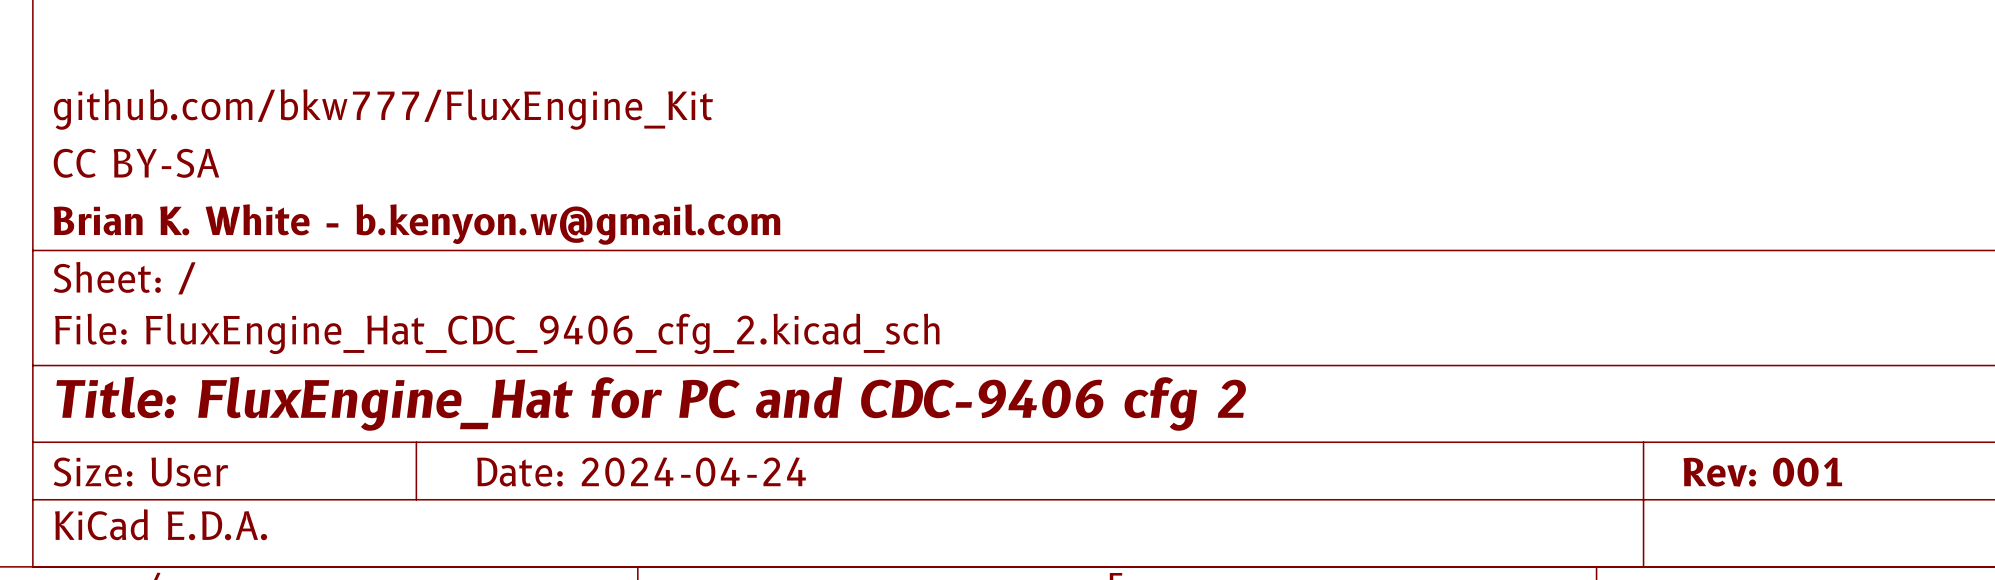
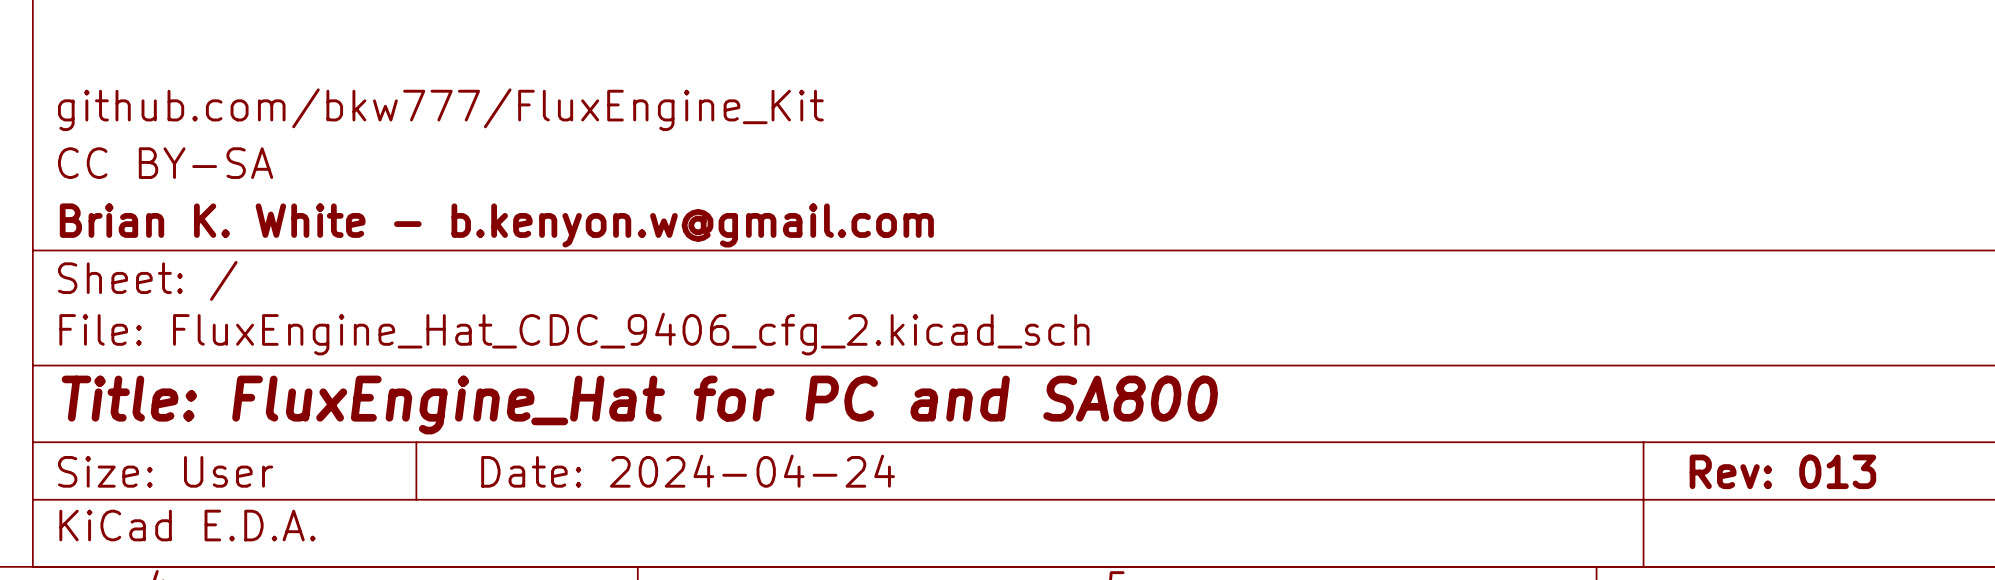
title block: Title: FluxEngine_Hat for PC and CDC-9406 cfg 2 (651, 403) -> Title: FluxEngine_Hat for PC and SA800 (639, 405)
title block: Rev: 001 (1762, 472) -> Rev: 013 (1782, 471)

